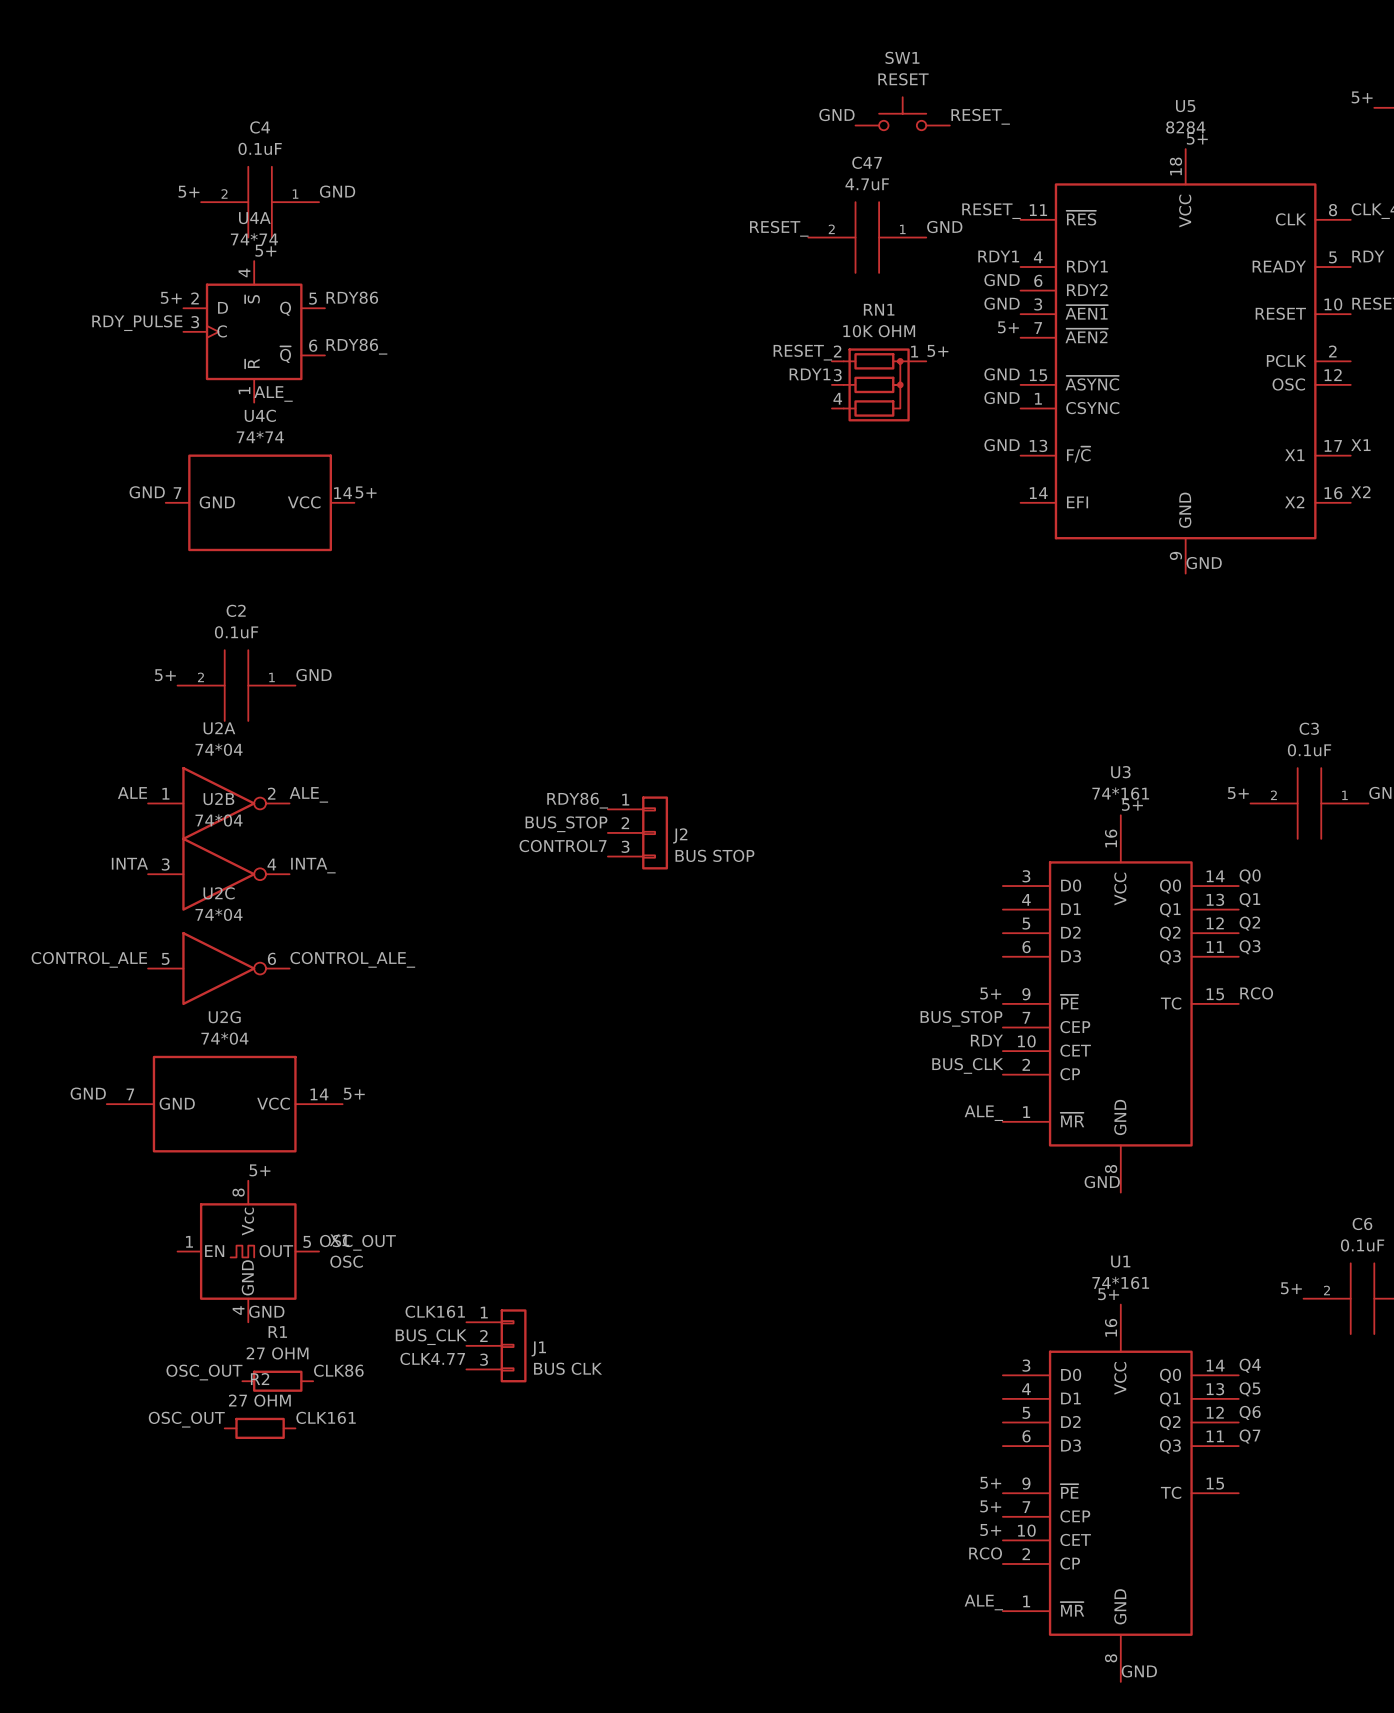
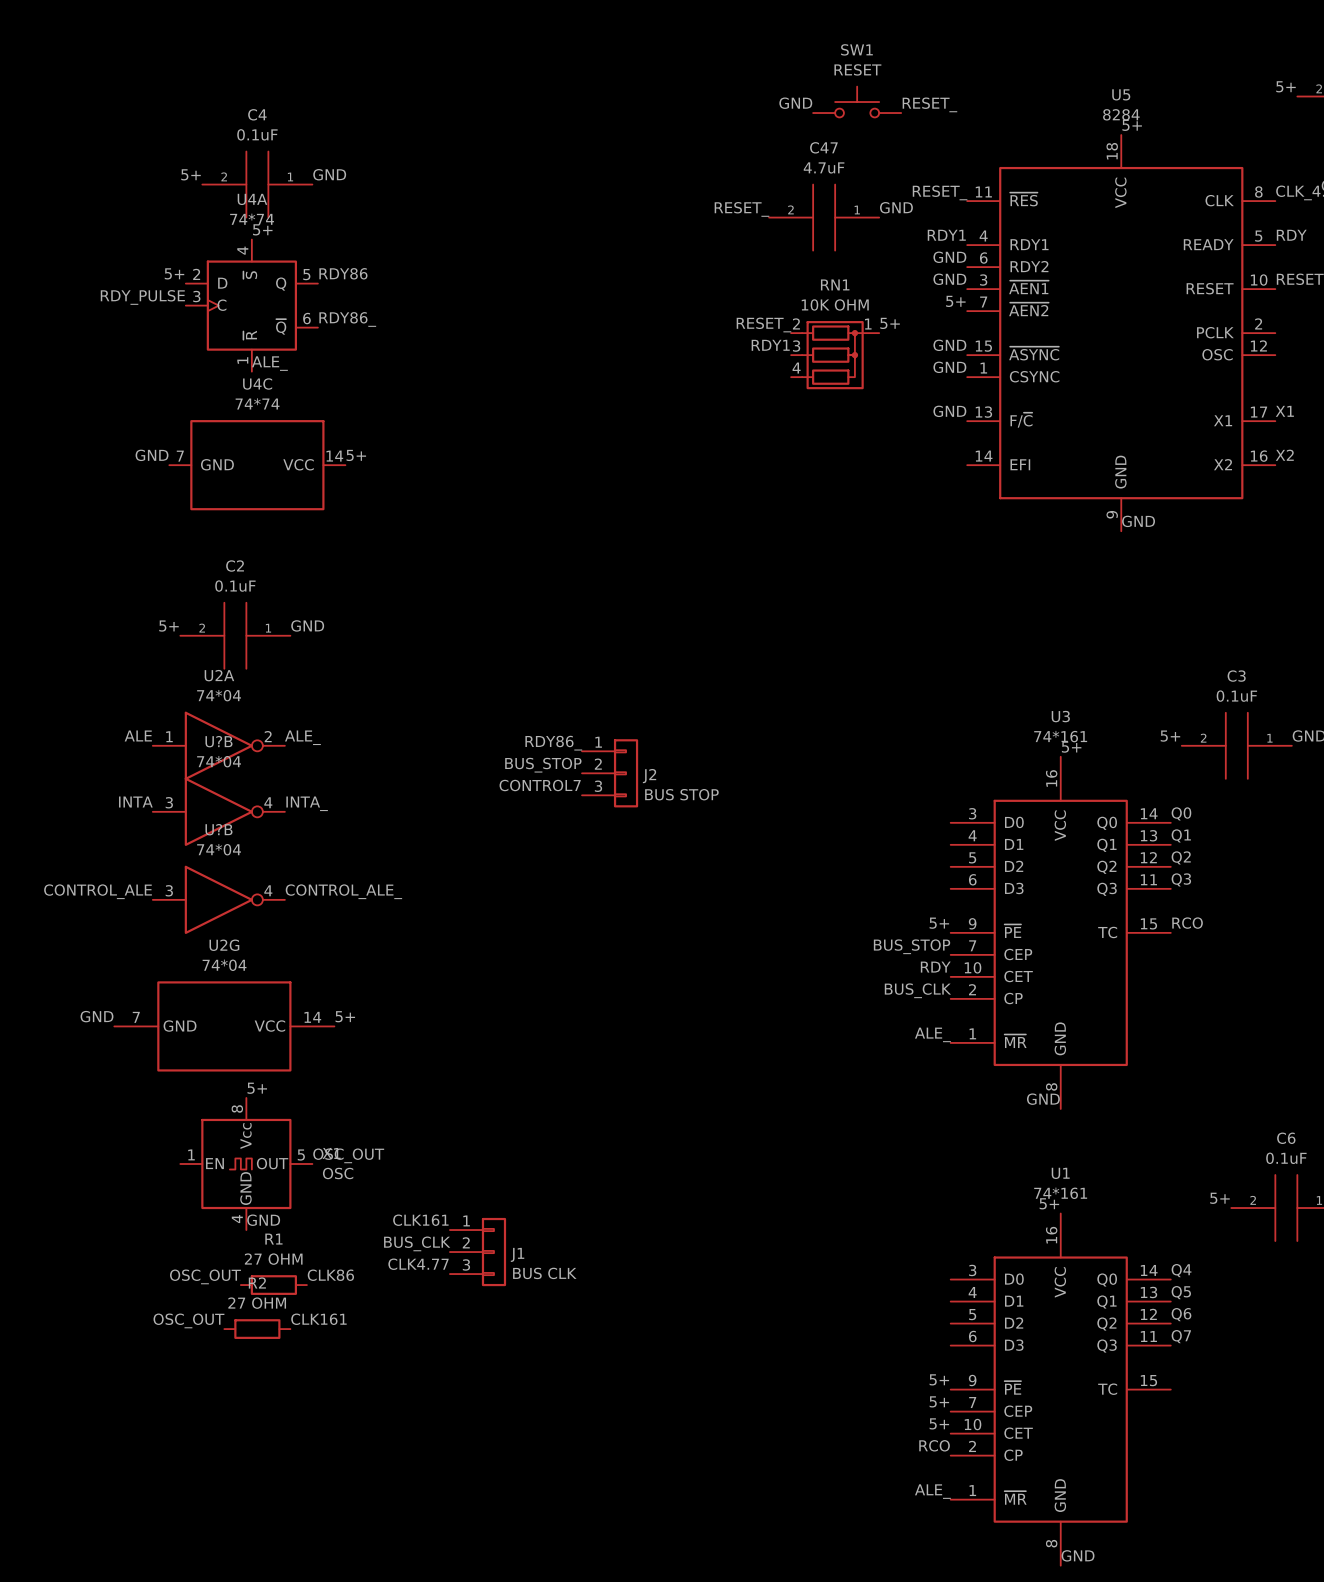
U2B name: U2B (218, 799) -> U?B (218, 741)
U2C name: U2C (219, 893) -> U?B (218, 829)
U2C pin number: 5 (165, 958) -> 3 (169, 890)
U2C pin number: 6 (271, 958) -> 4 (268, 890)

